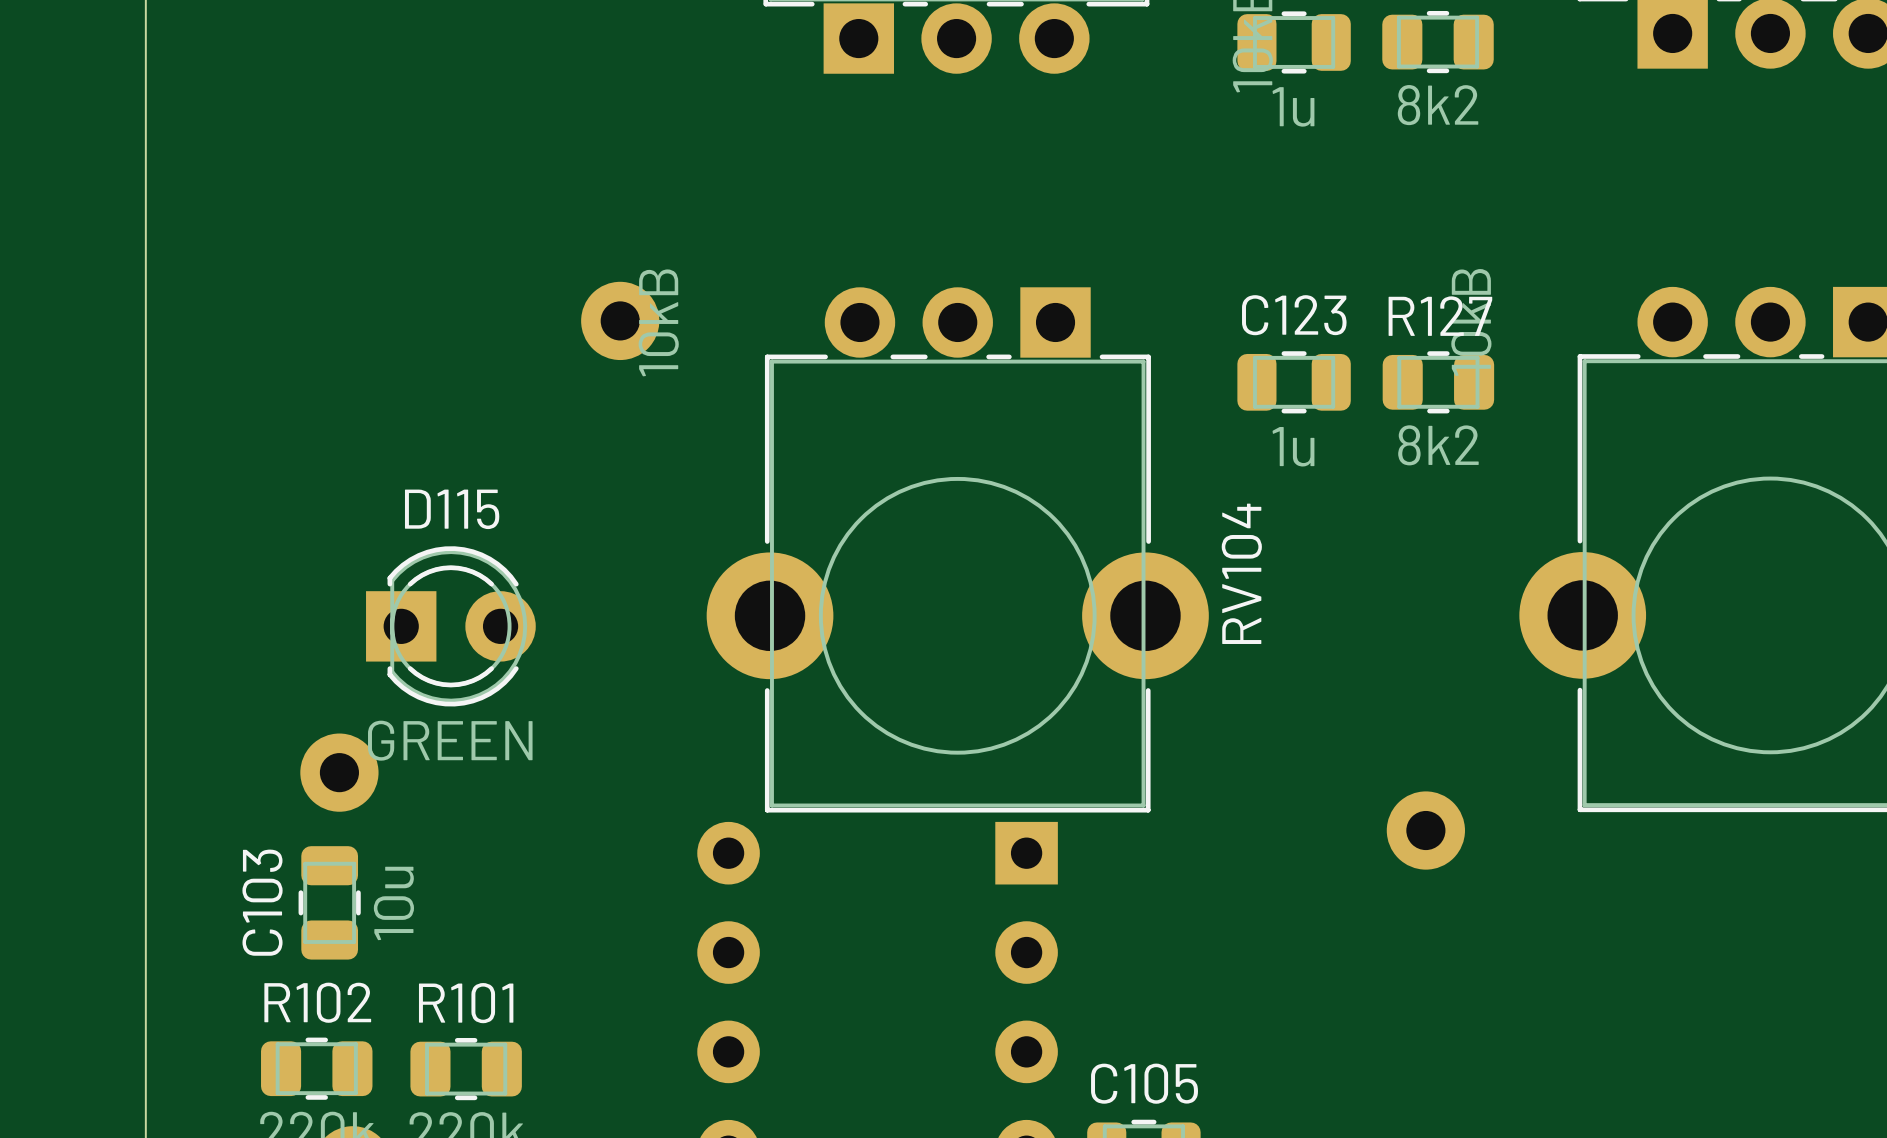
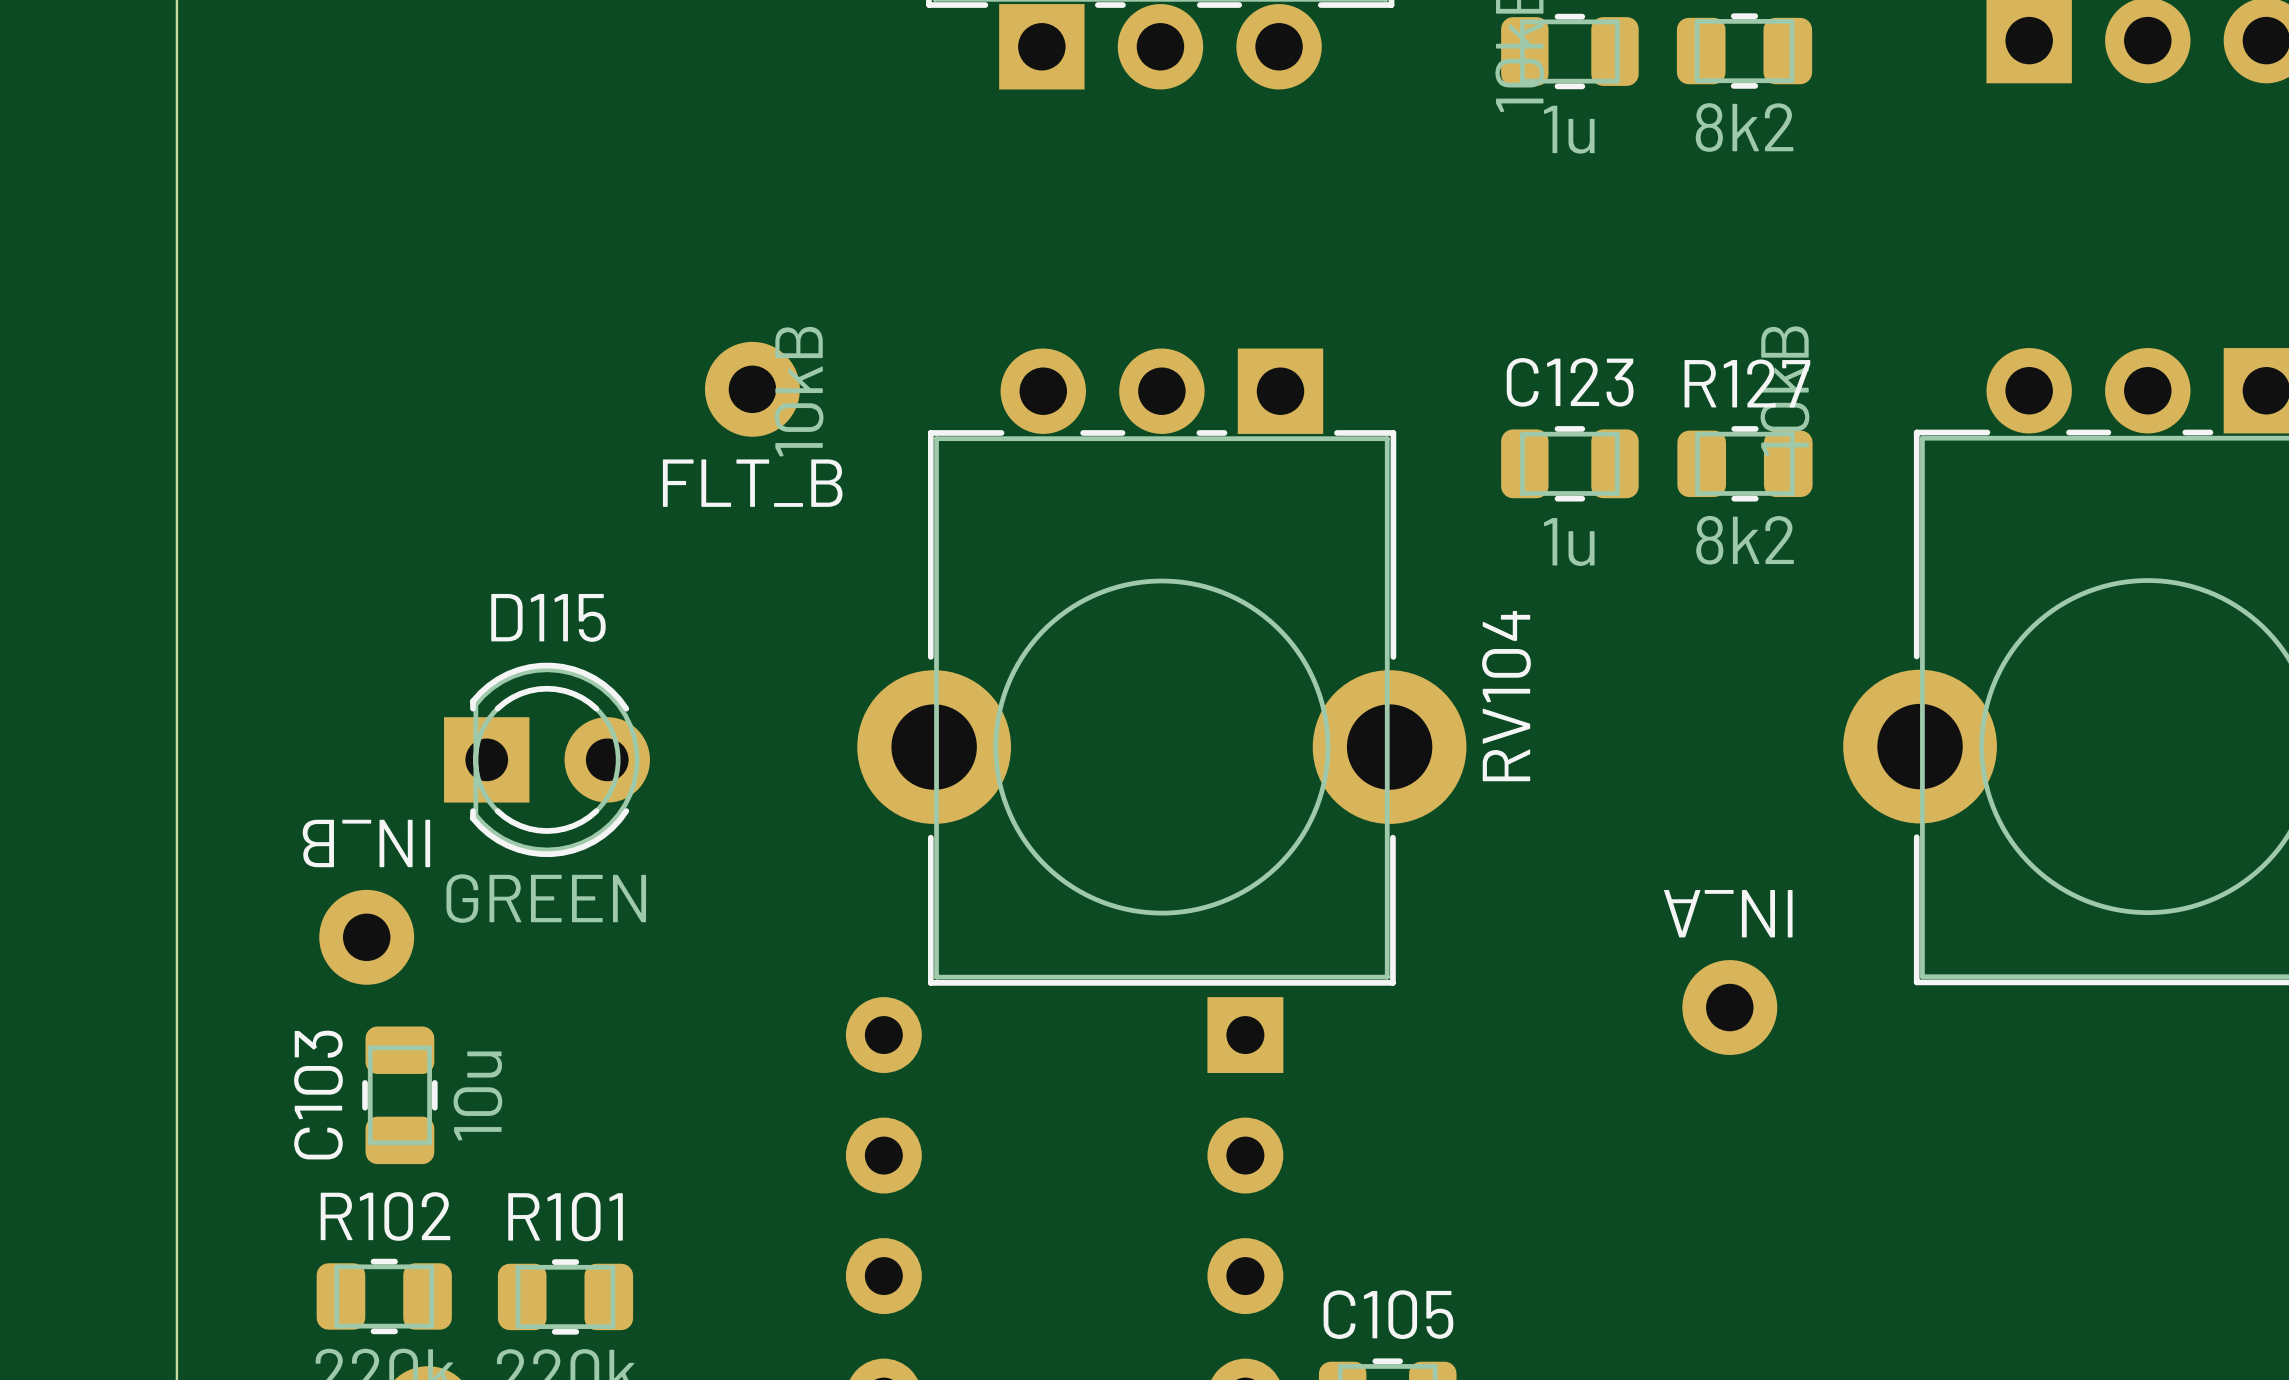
part value: none -> FLT_B (752, 483)
part value: none -> IN_B (366, 843)
part value: none -> IN_A (1728, 913)
part position: (339, 772) -> (366, 937)

